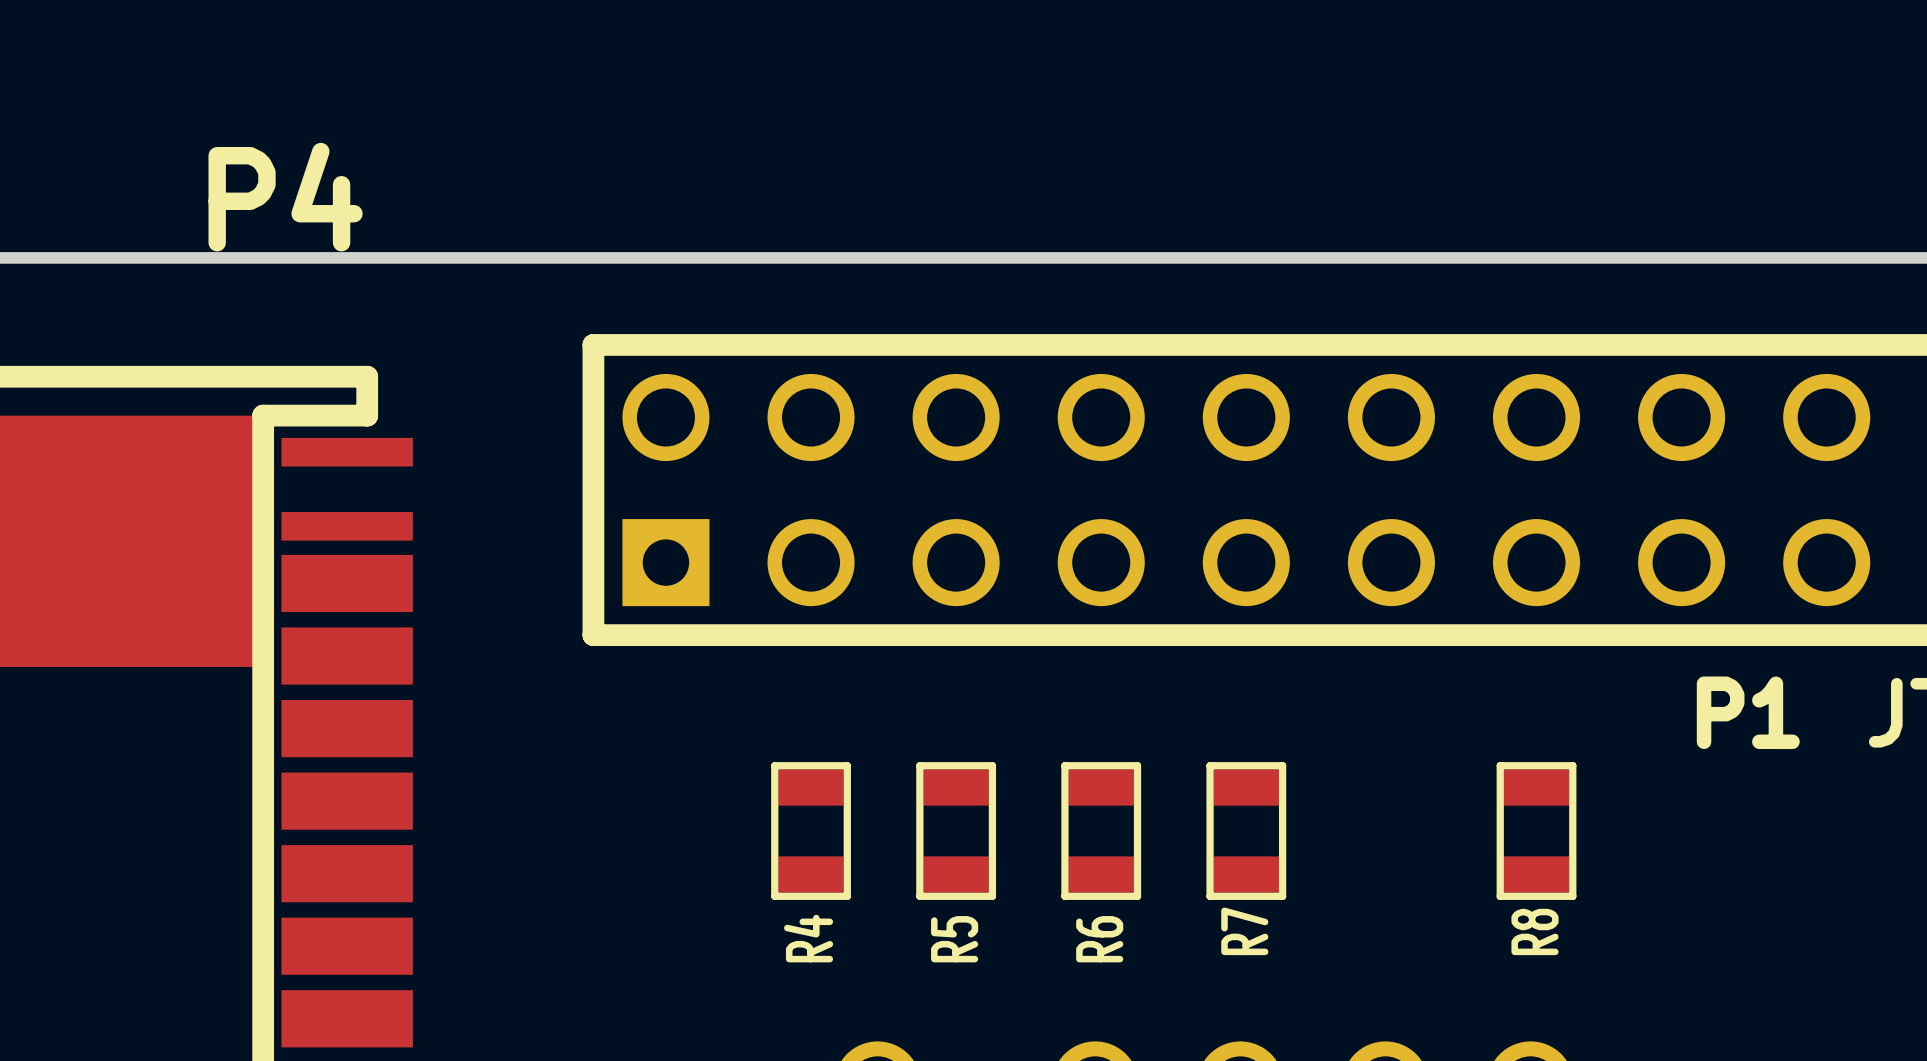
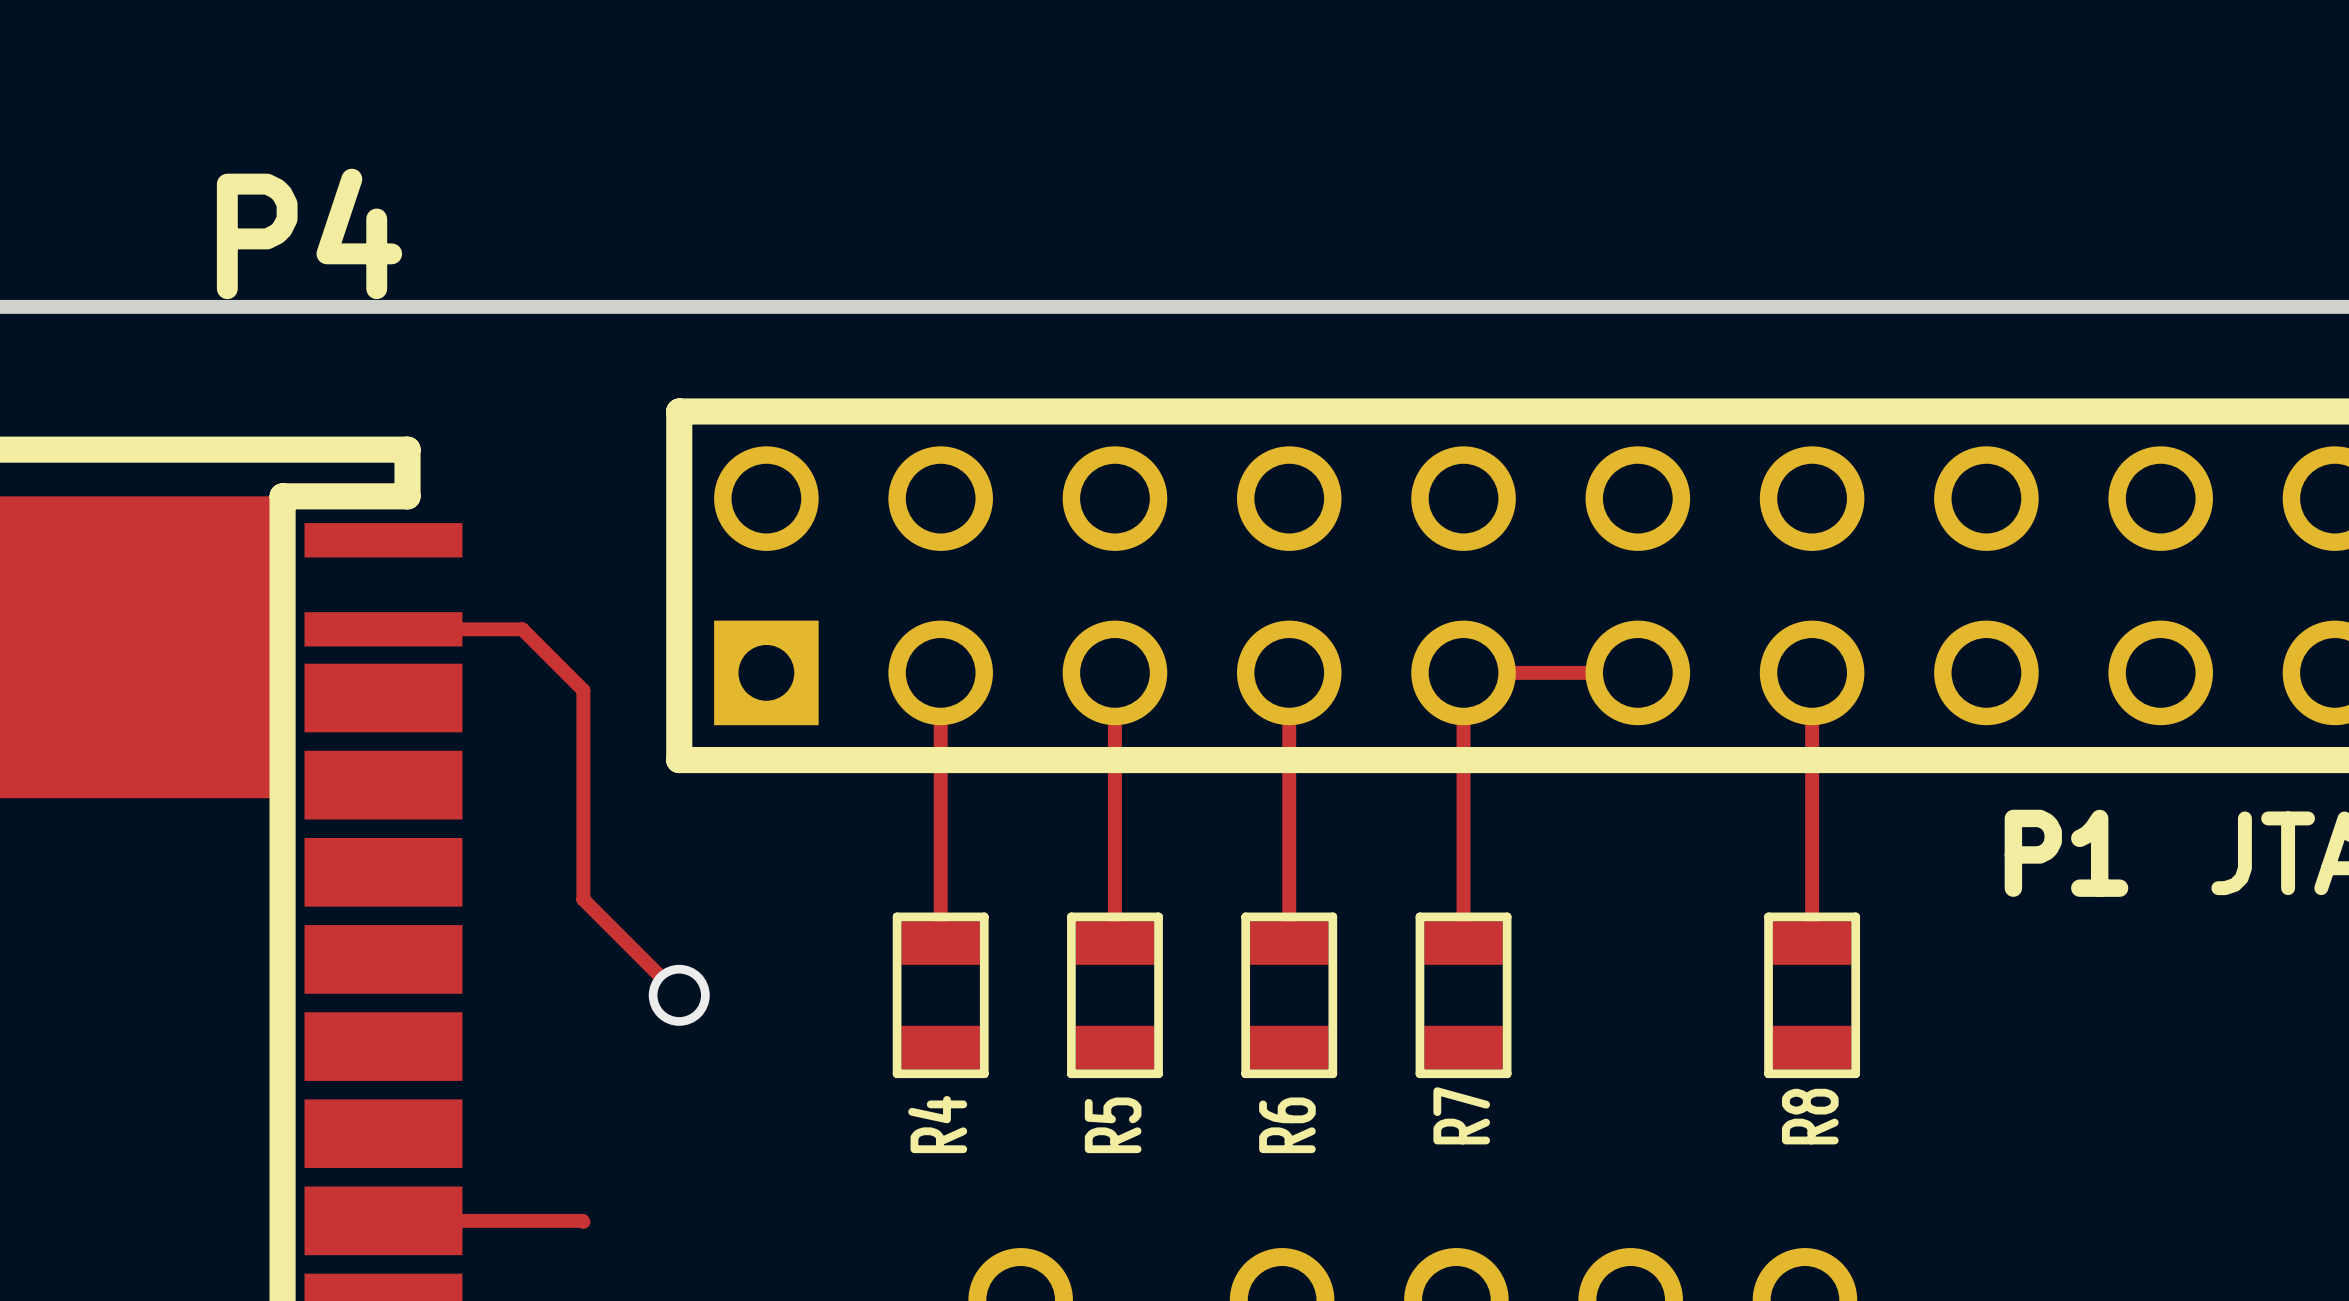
track: none -> (383, 629) (522, 629) (583, 690) (583, 899) (679, 995)
track: none -> (940, 672) (940, 943)
track: none -> (1114, 672) (1114, 943)
track: none -> (1289, 672) (1289, 943)
track: none -> (1637, 672) (1463, 672) (1463, 943)
track: none -> (1812, 672) (1812, 943)
via: none -> (679, 995)
track: none -> (383, 1220) (583, 1221)

